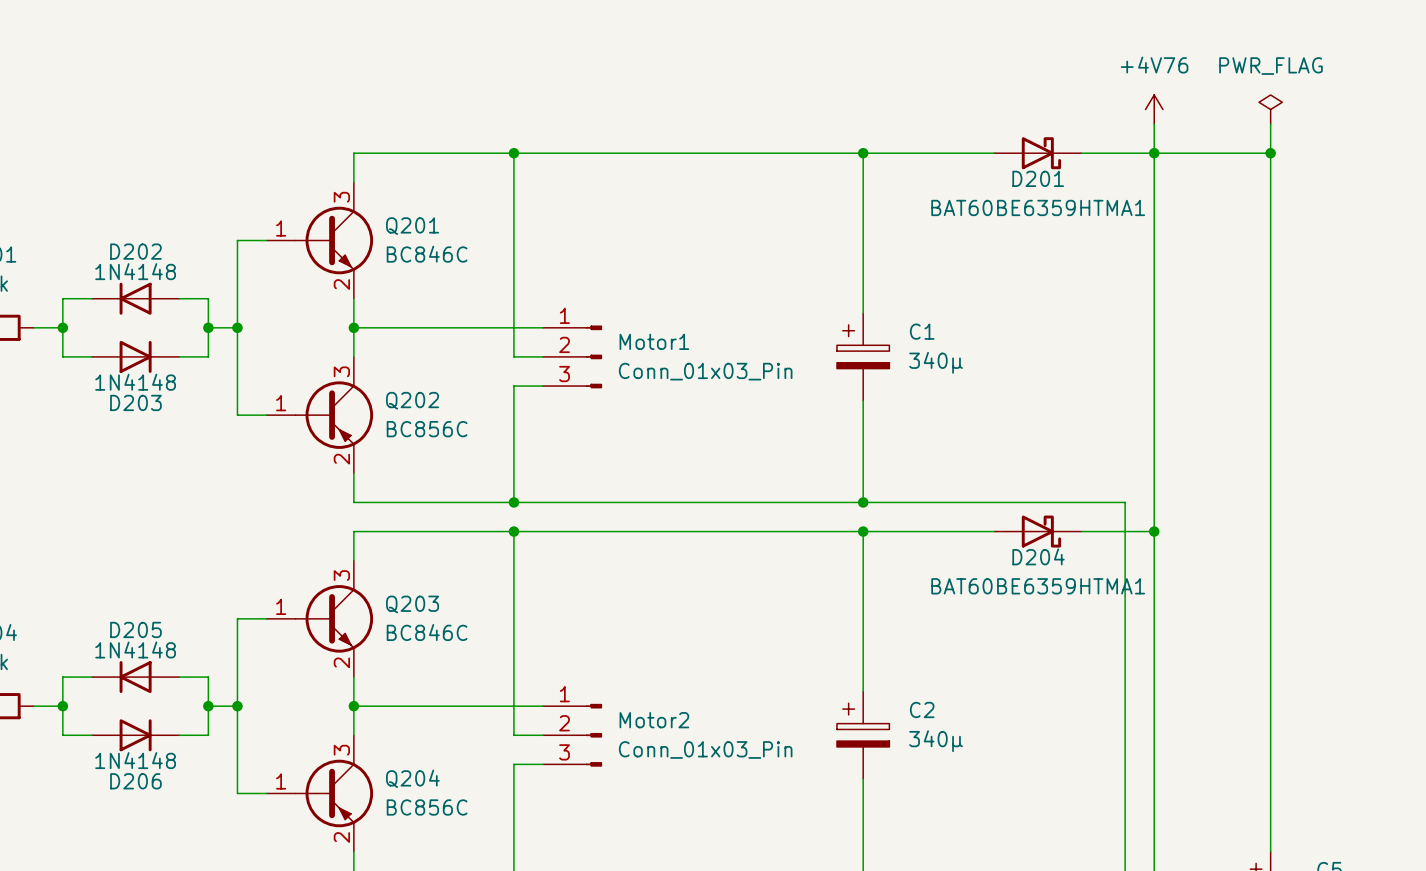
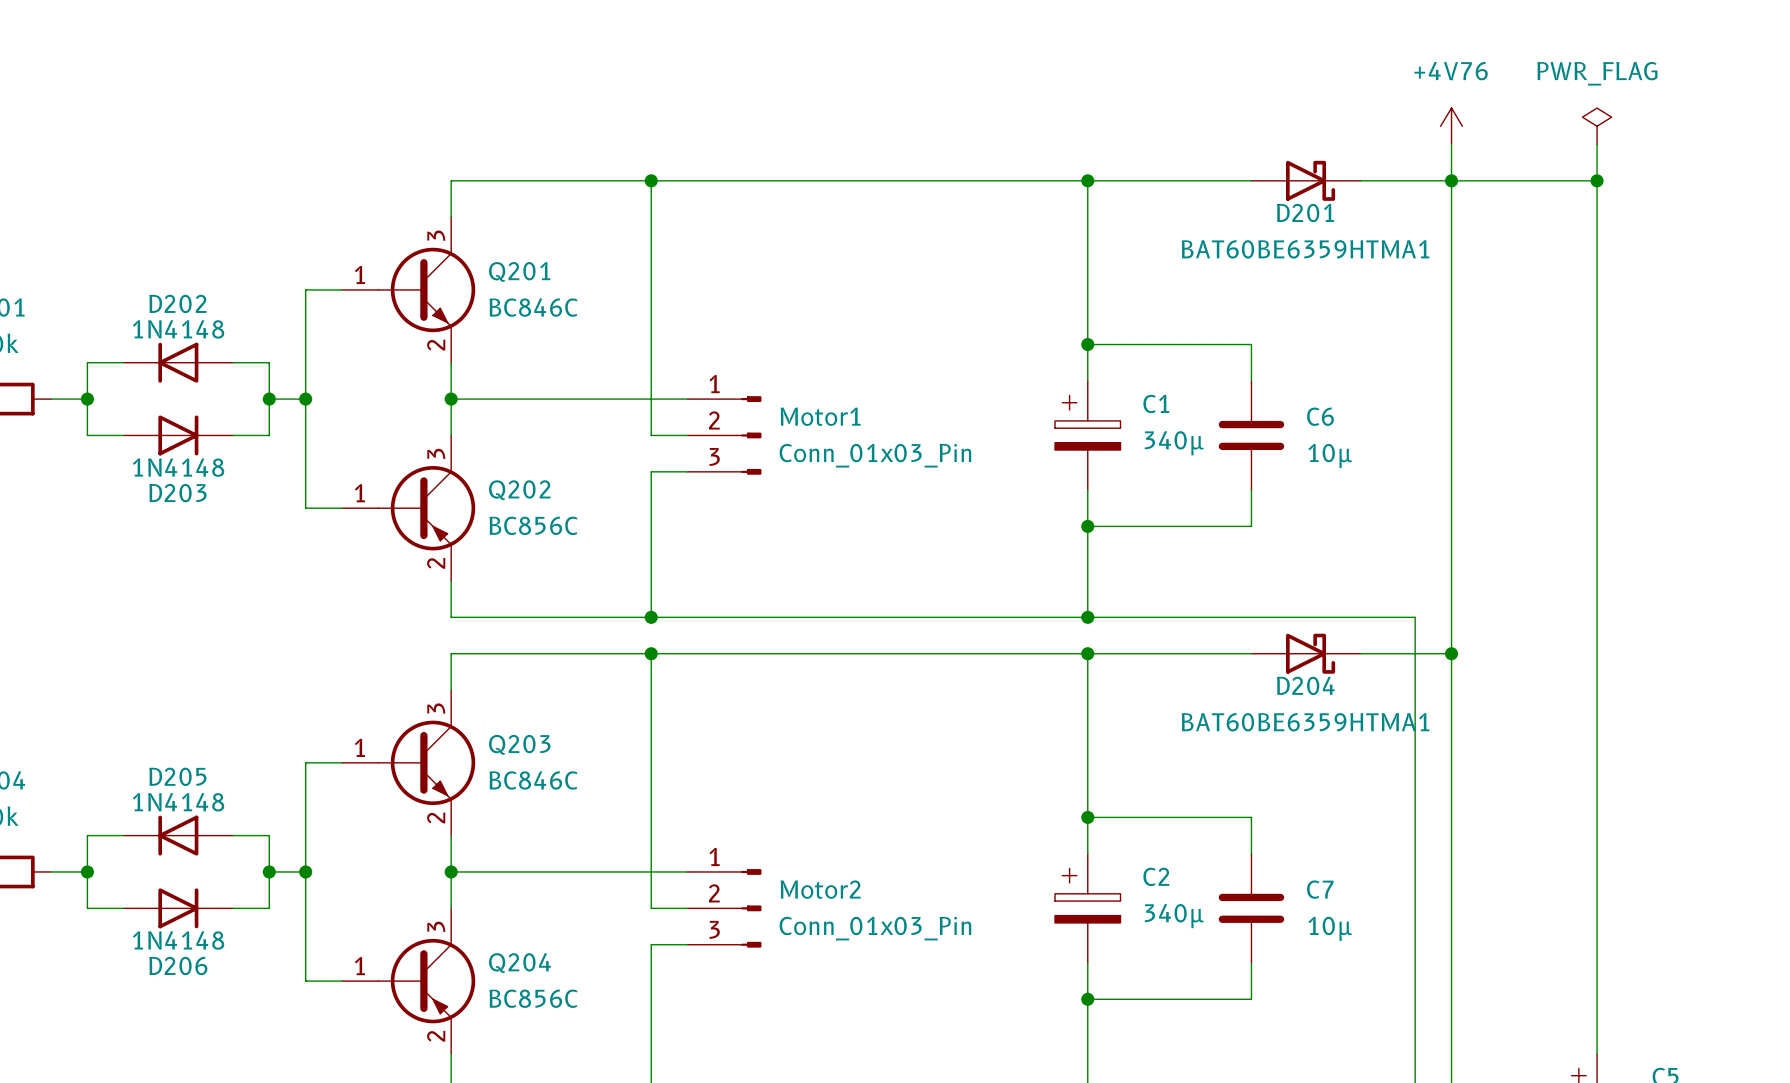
wire: none -> (1087, 344) (1251, 344) (1251, 380)
junction: none -> (1087, 344)
C6: none -> 10µ (1251, 435)
wire: none -> (1251, 490) (1251, 526) (1087, 526)
junction: none -> (1087, 526)
wire: none -> (1087, 817) (1251, 817) (1251, 853)
junction: none -> (1087, 817)
C7: none -> 10µ (1251, 908)
wire: none -> (1251, 962) (1251, 999) (1087, 999)
junction: none -> (1087, 999)

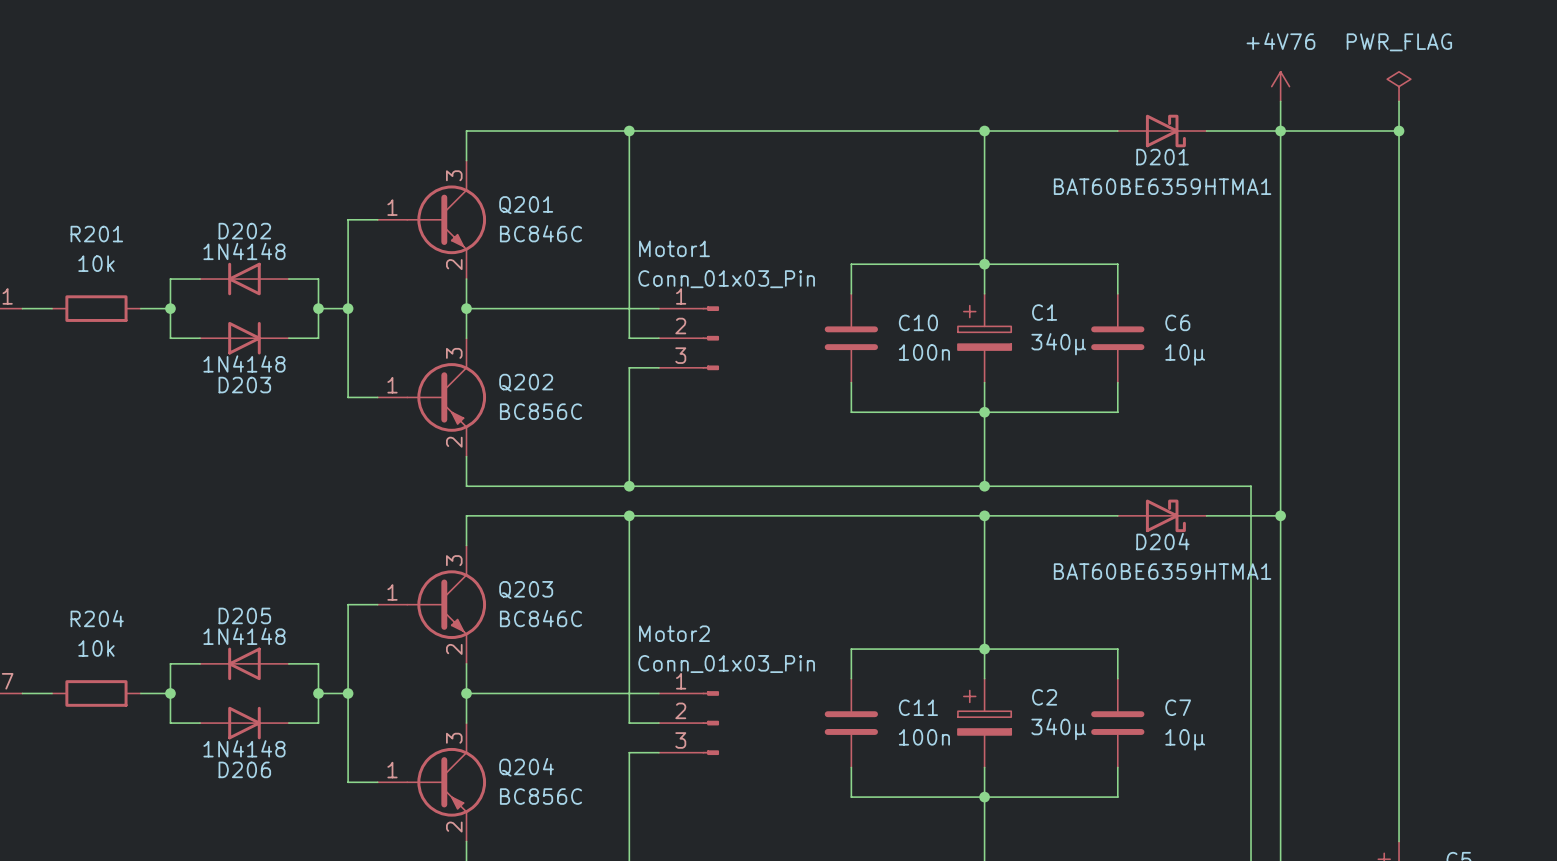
wire: none -> (984, 264) (851, 264) (851, 293)
Motor1 name position: Motor1 (820, 416) -> Motor1 (674, 248)
C10: none -> 100n (851, 338)
Motor1 value position: Conn_01x03_Pin (875, 455) -> Conn_01x03_Pin (726, 279)
wire: none -> (851, 382) (851, 412) (984, 412)
wire: none -> (984, 649) (851, 649) (851, 678)
Motor2 name position: Motor2 (820, 889) -> Motor2 (674, 633)
C11: none -> 100n (851, 723)
Motor2 value position: Conn_01x03_Pin (875, 928) -> Conn_01x03_Pin (726, 664)
wire: none -> (851, 767) (851, 797) (984, 797)

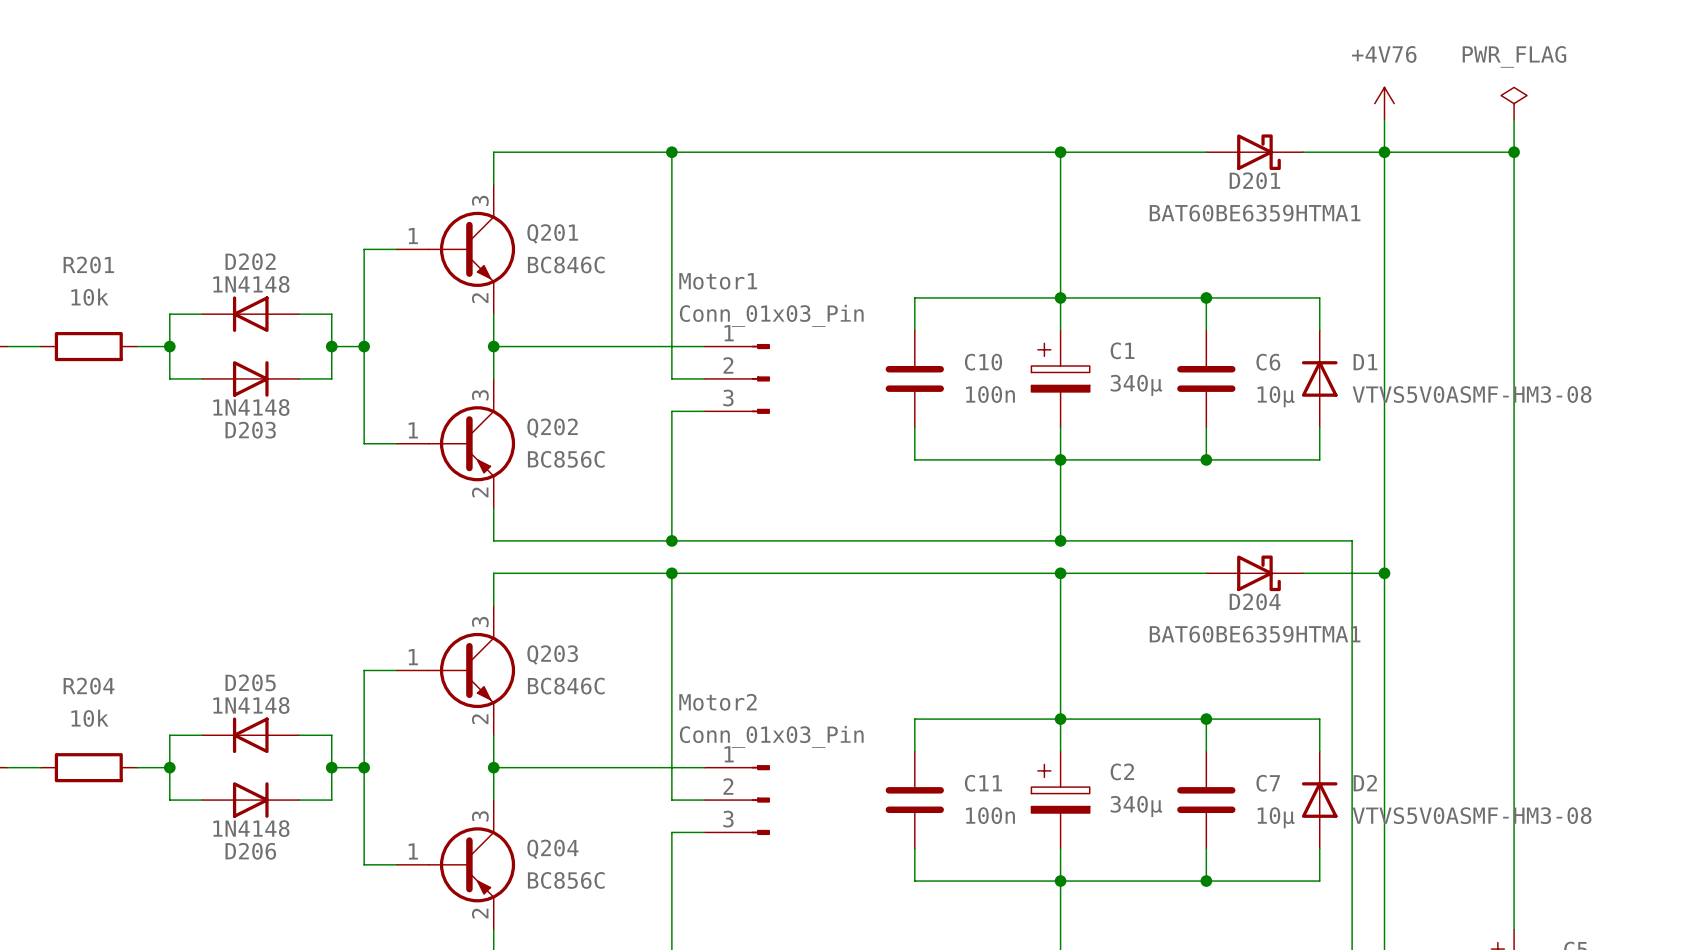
wire: none -> (1206, 297) (1319, 297) (1319, 330)
junction: none -> (1206, 297)
D1: none -> VTVS5V0ASMF-HM3-08 (1319, 378)
wire: none -> (1319, 427) (1319, 459) (1206, 459)
junction: none -> (1206, 459)
wire: none -> (1206, 719) (1319, 719) (1319, 751)
junction: none -> (1206, 719)
D2: none -> VTVS5V0ASMF-HM3-08 (1319, 800)
wire: none -> (1319, 848) (1319, 881) (1206, 881)
junction: none -> (1206, 881)

